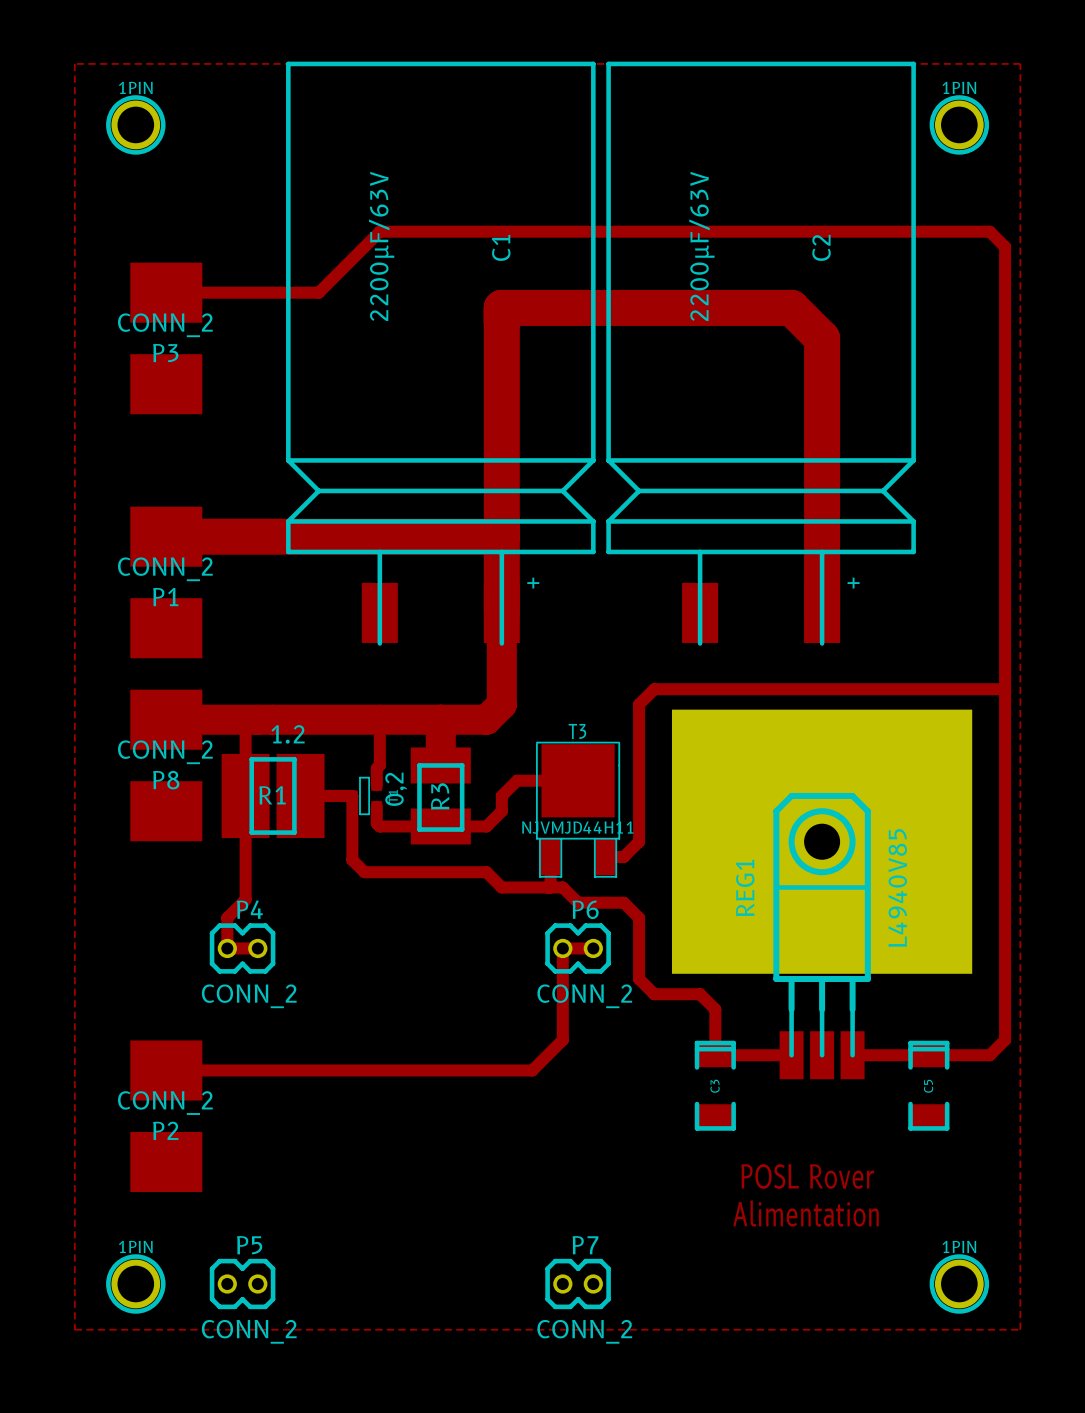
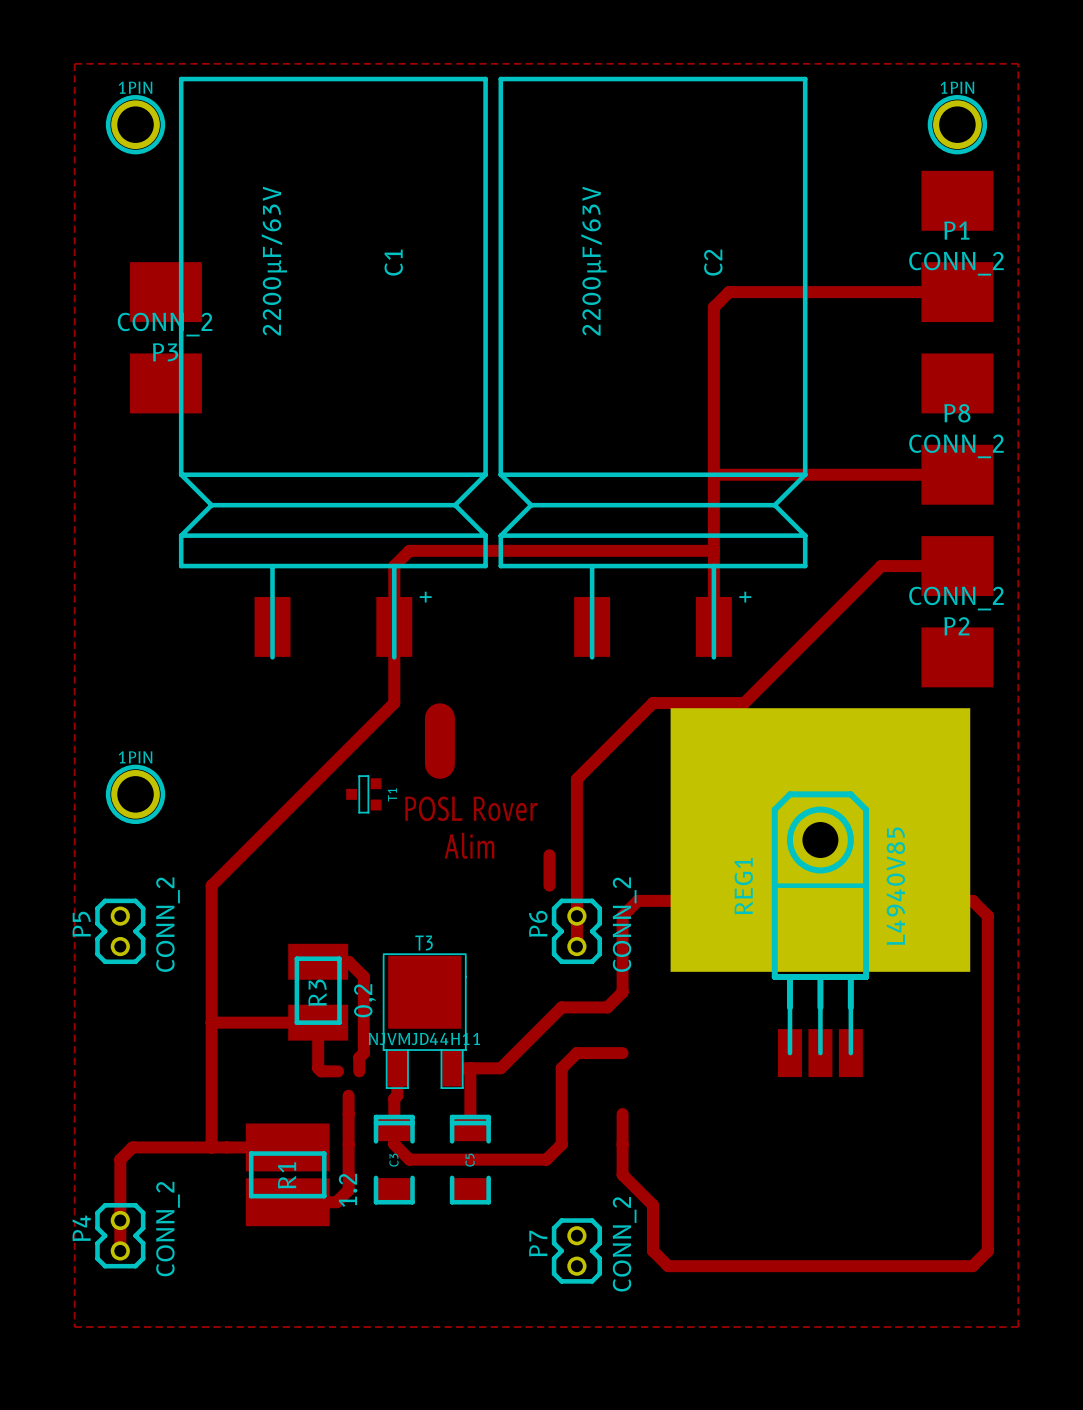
top track: (166, 292) (318, 292) (379, 231) (989, 231) (1005, 246) (1005, 1039) (989, 1055) (852, 1055) -> none
top track: none -> (957, 292) (729, 292) (713, 307) (713, 626)
C1 position: (440, 353) -> (333, 368)
C2 position: (761, 353) -> (653, 368)
top track: none -> (713, 474) (957, 474)
top track: (166, 536) (501, 536) -> none
top track: none -> (713, 550) (409, 550) (394, 566) (394, 703) (211, 885) (211, 1147)
top track: none -> (957, 566) (881, 566) (744, 703) (653, 703) (576, 779) (576, 946)
P1 value position: CONN_2 (165, 569) -> CONN_2 (956, 263)
P1 position: (166, 582) -> (957, 246)
P1 name position: P1 (165, 597) -> P1 (956, 230)
top track: (822, 612) (822, 338) (791, 307) (501, 307) (501, 704) (486, 719) (166, 719) -> none
top track: (1005, 689) (654, 689) (639, 704) (639, 841) (623, 856) (605, 856) -> none
top track: (257, 719) (245, 719) (245, 899) (227, 917) (227, 948) (257, 948) -> none
top track: (379, 719) (379, 765) (376, 768) (376, 785) -> none
P8 value position: CONN_2 (165, 752) -> CONN_2 (956, 446)
P8 position: (166, 765) -> (957, 429)
P8 name position: P8 (166, 780) -> P8 (957, 413)
top track: (578, 780) (517, 780) (501, 795) (501, 811) (486, 826) (379, 826) (376, 823) (376, 806) -> none
1PIN: none -> (135, 794)
R1 rotation: 0° (273, 795) -> 90° clockwise (287, 1174)
R1 position: (273, 795) -> (287, 1174)
top track: (300, 795) (352, 795) (352, 860) (364, 872) (486, 872) (501, 887) (562, 887) (578, 902) (623, 902) (639, 917) (639, 978) (654, 994) (700, 994) (715, 1009) (715, 1055) (791, 1055) -> none
R3 rotation: 0° (440, 795) -> 180° (318, 992)
R3 position: (440, 795) -> (318, 992)
T3 position: (578, 809) -> (424, 1021)
text: none -> POSL Rover (471, 808)
text: none -> Alim (469, 845)
P4 name position: P4 (249, 909) -> P4 (81, 1228)
P6 name position: P6 (585, 909) -> P6 (538, 923)
P4 rotation: 0° (242, 948) -> 90° clockwise (120, 1235)
P4 position: (242, 948) -> (120, 1235)
P6 rotation: 0° (578, 948) -> 90° clockwise (576, 931)
top track: (593, 948) (562, 948) (562, 1039) (532, 1070) (501, 1070) -> (622, 1113) (622, 1174) (653, 1205) (653, 1250) (668, 1266) (972, 1266) (987, 1250) (987, 916) (972, 900) (637, 900) (622, 916) (622, 992) (607, 1007) (561, 1007) (500, 1068)
top track: none -> (318, 961) (348, 961) (363, 976) (363, 1053) (359, 1057) (359, 1071)
P4 value position: CONN_2 (249, 996) -> CONN_2 (168, 1229)
P6 value position: CONN_2 (584, 996) -> CONN_2 (624, 924)
top track: none -> (211, 1022) (318, 1022) (318, 1068) (321, 1071) (337, 1071)
top track: none -> (622, 1053) (576, 1053) (561, 1068) (561, 1144) (546, 1159) (409, 1159) (394, 1144) (394, 1098) (397, 1095) (397, 1068)
top track: (166, 1070) (453, 1070) -> none
top track: none -> (470, 1068) (470, 1129)
C3 position: (715, 1085) -> (394, 1159)
C5 position: (928, 1085) -> (470, 1159)
top track: none -> (348, 1095) (348, 1190) (336, 1202) (287, 1202)
P2 position: (166, 1116) -> (957, 611)
top track: none -> (287, 1147) (132, 1147) (120, 1159) (120, 1250)
text: POSL Rover (807, 1176) -> none
text: Alimentation (806, 1213) -> none
P5 name position: P5 (249, 1245) -> P5 (81, 924)
P7 name position: P7 (585, 1245) -> P7 (538, 1243)
1PIN: (135, 1283) -> none
P5 rotation: 0° (242, 1283) -> 90° clockwise (120, 931)
P5 position: (242, 1283) -> (120, 931)
P7 rotation: 0° (578, 1283) -> 90° clockwise (576, 1250)
1PIN: (959, 1283) -> none
P5 value position: CONN_2 (249, 1331) -> CONN_2 (168, 924)
P7 value position: CONN_2 (584, 1331) -> CONN_2 (624, 1244)

